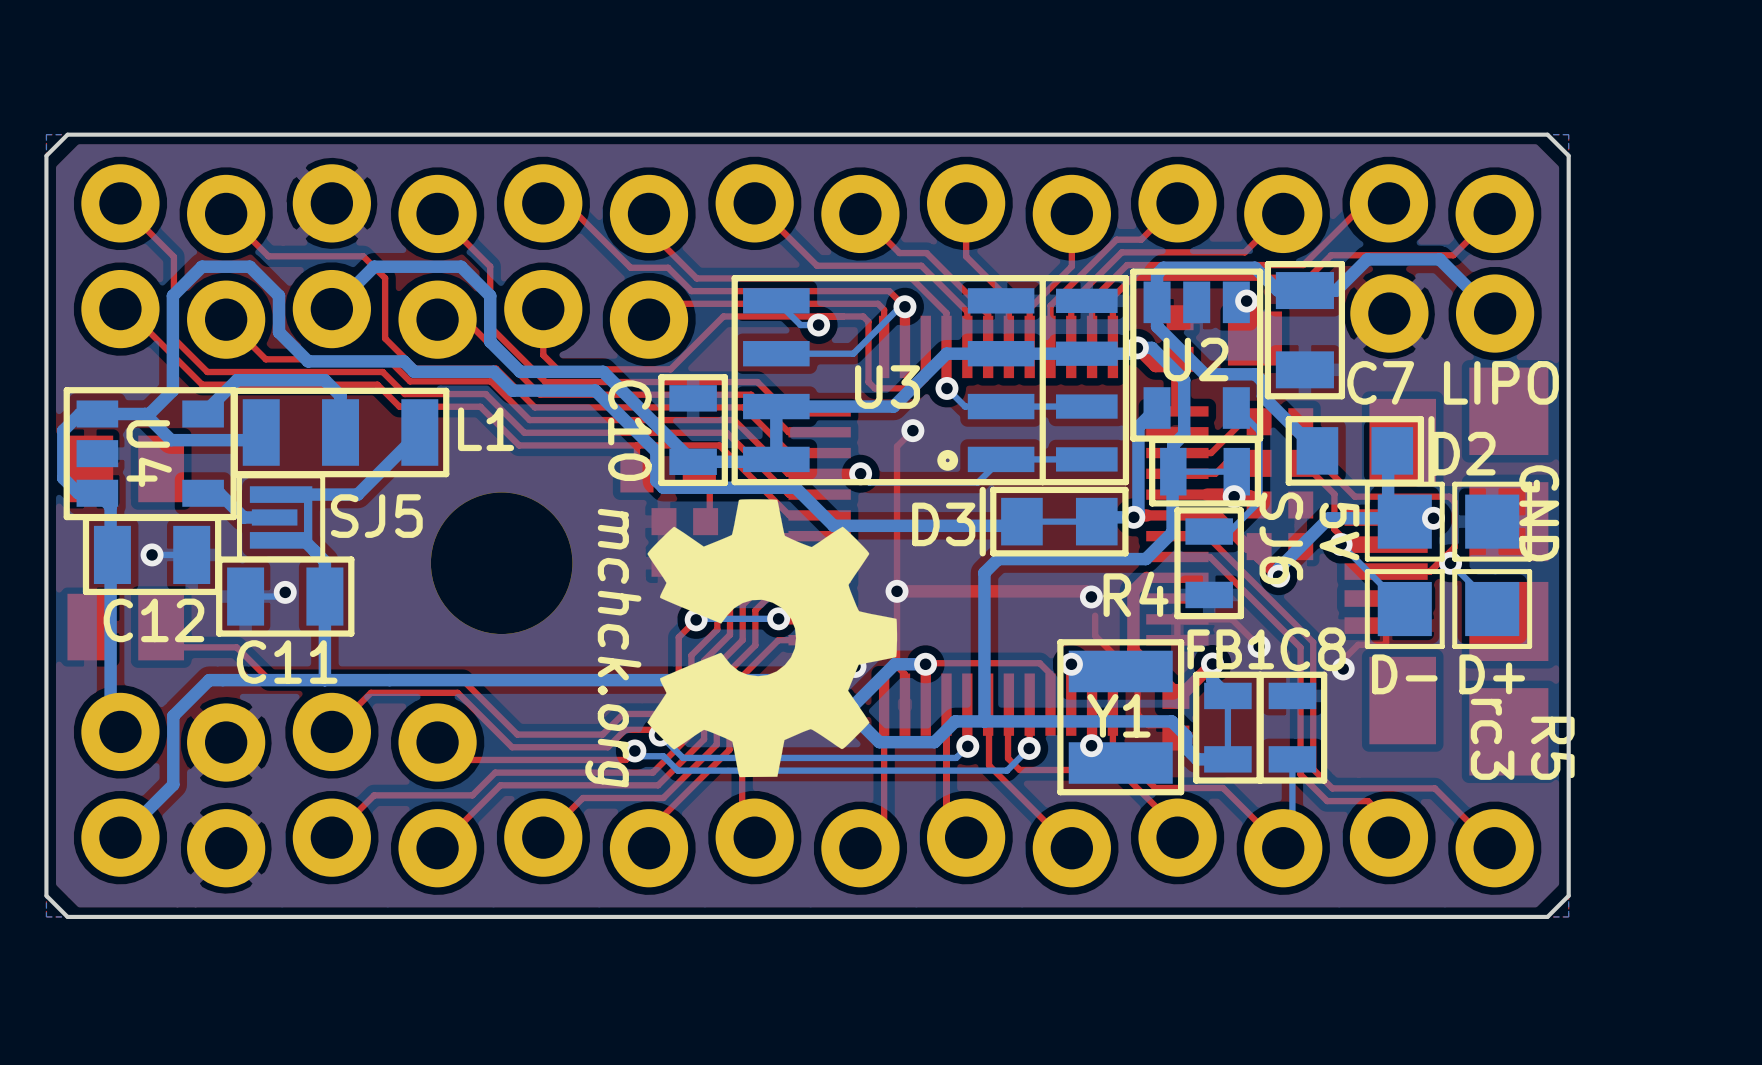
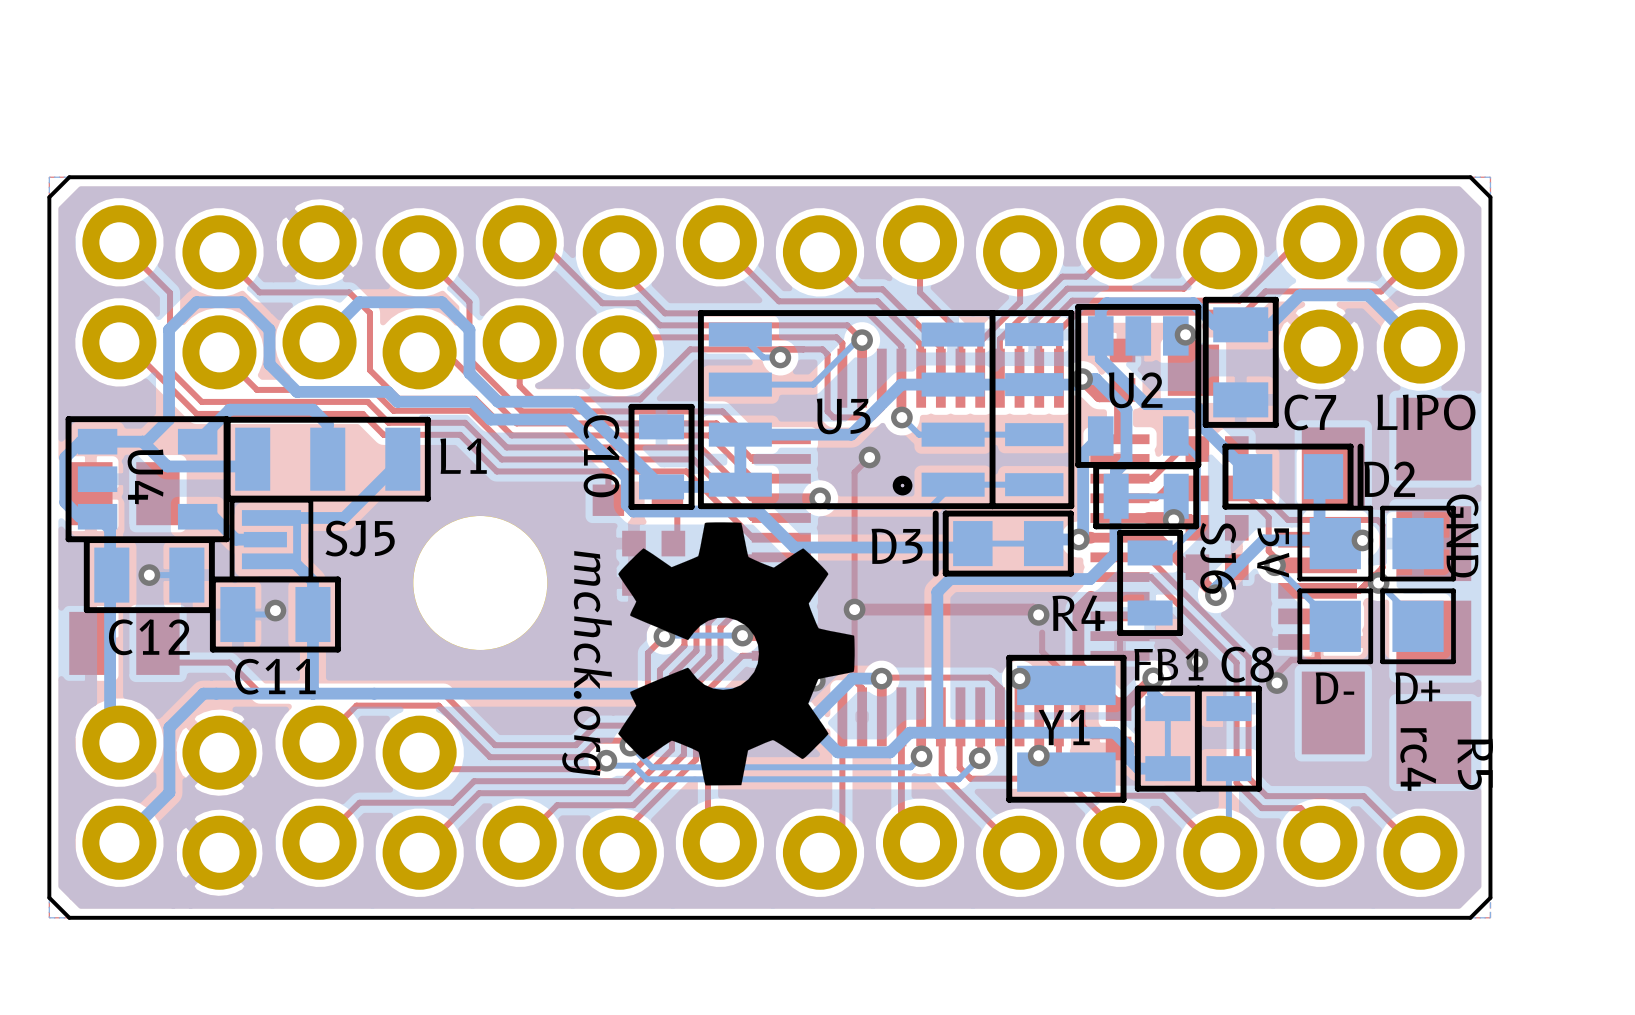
text: rc3 (1492, 739) -> rc4 (1418, 759)

